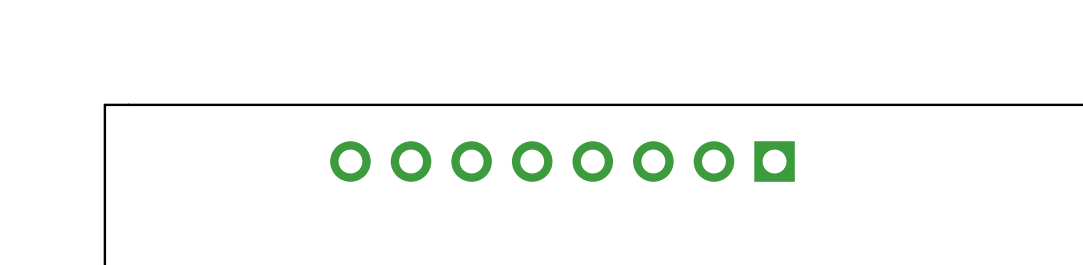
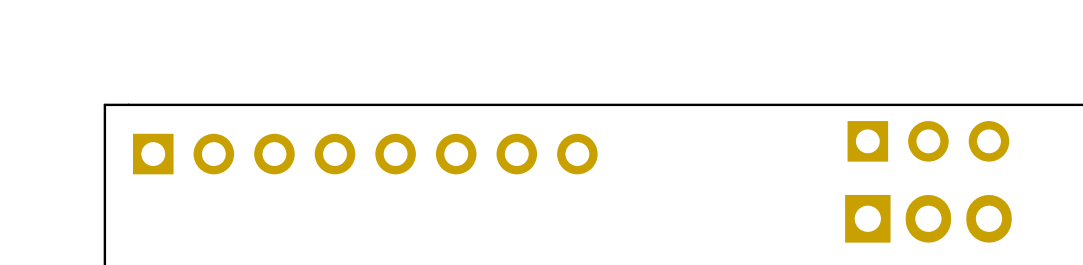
part: none -> (928, 141)
part rotation: 0° (562, 161) -> 180° (365, 154)
part: none -> (928, 218)

